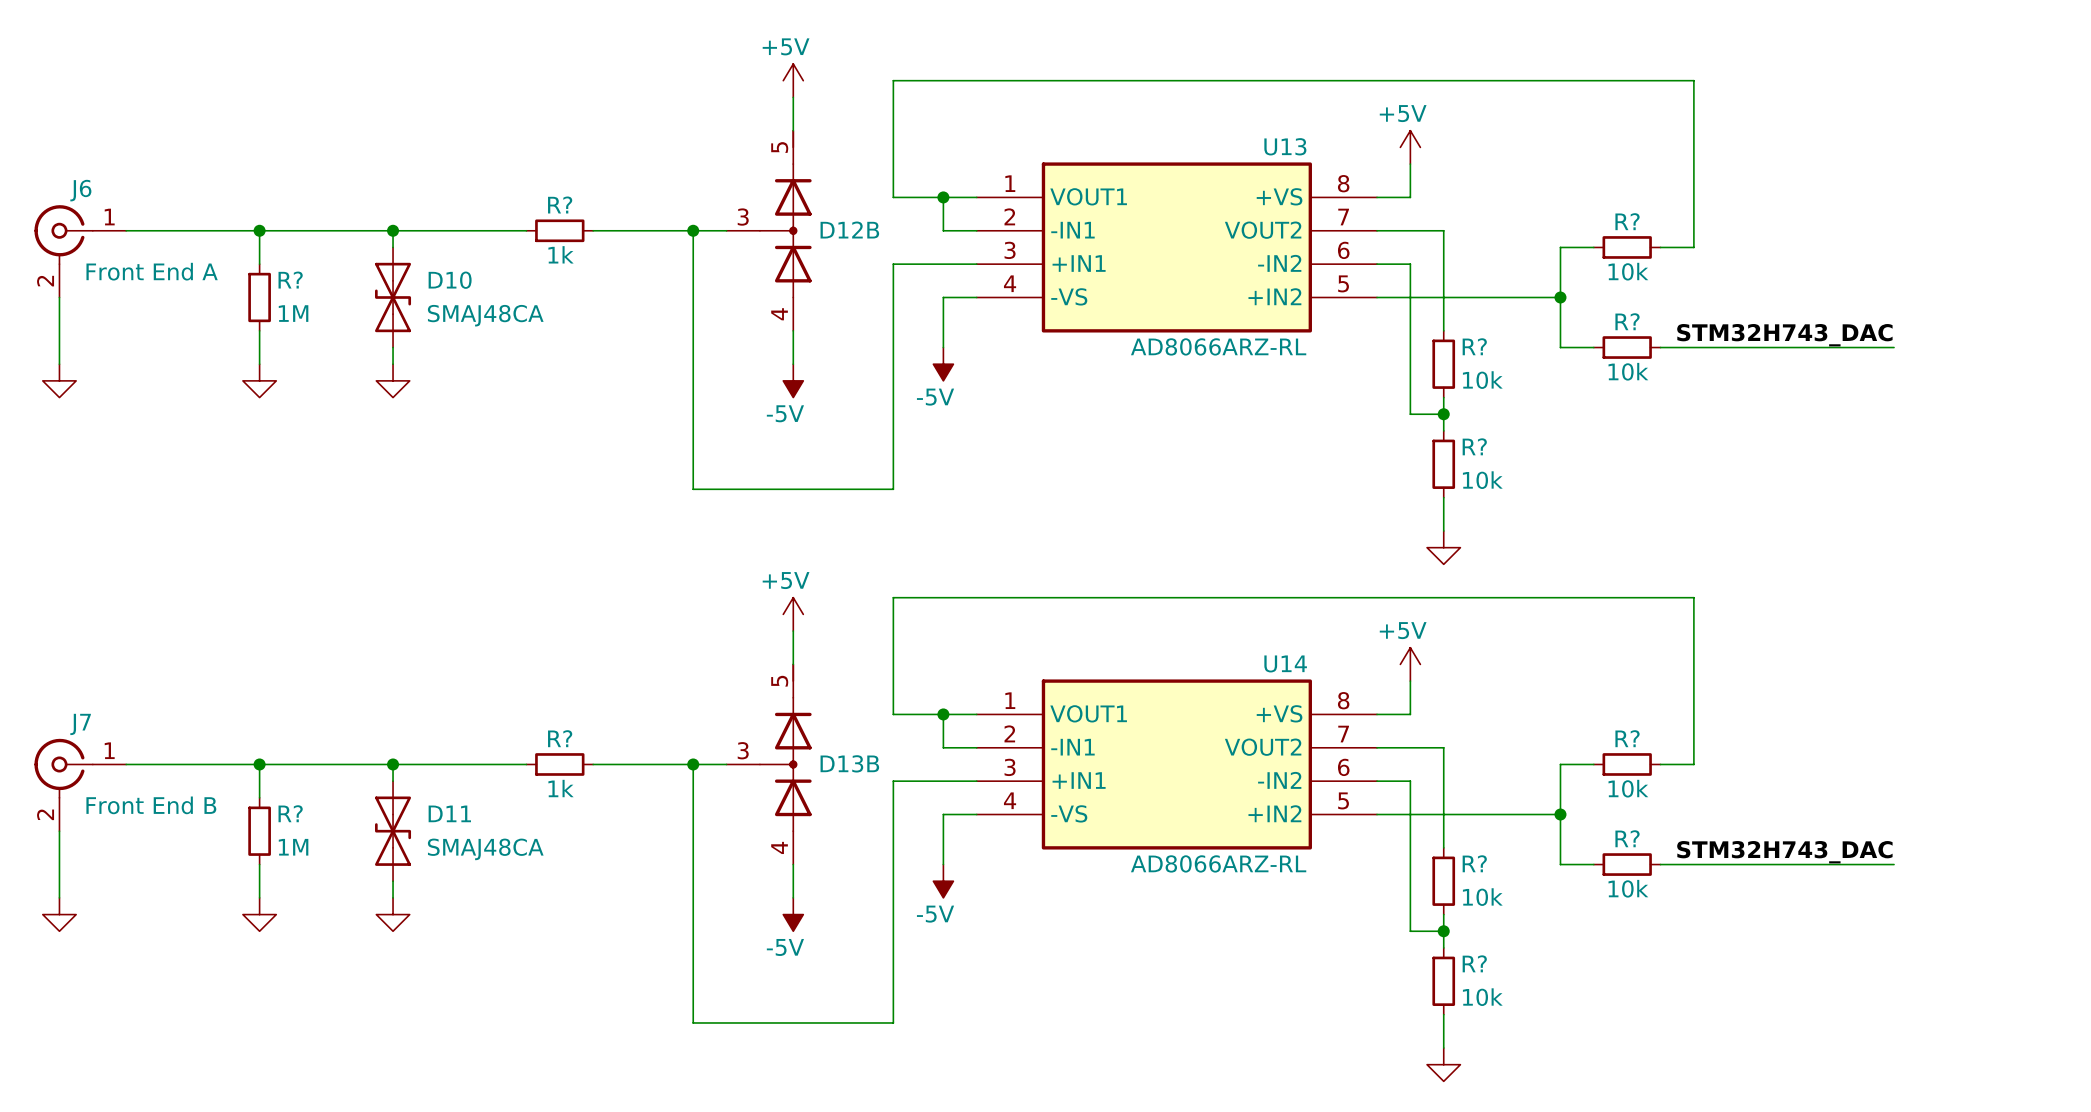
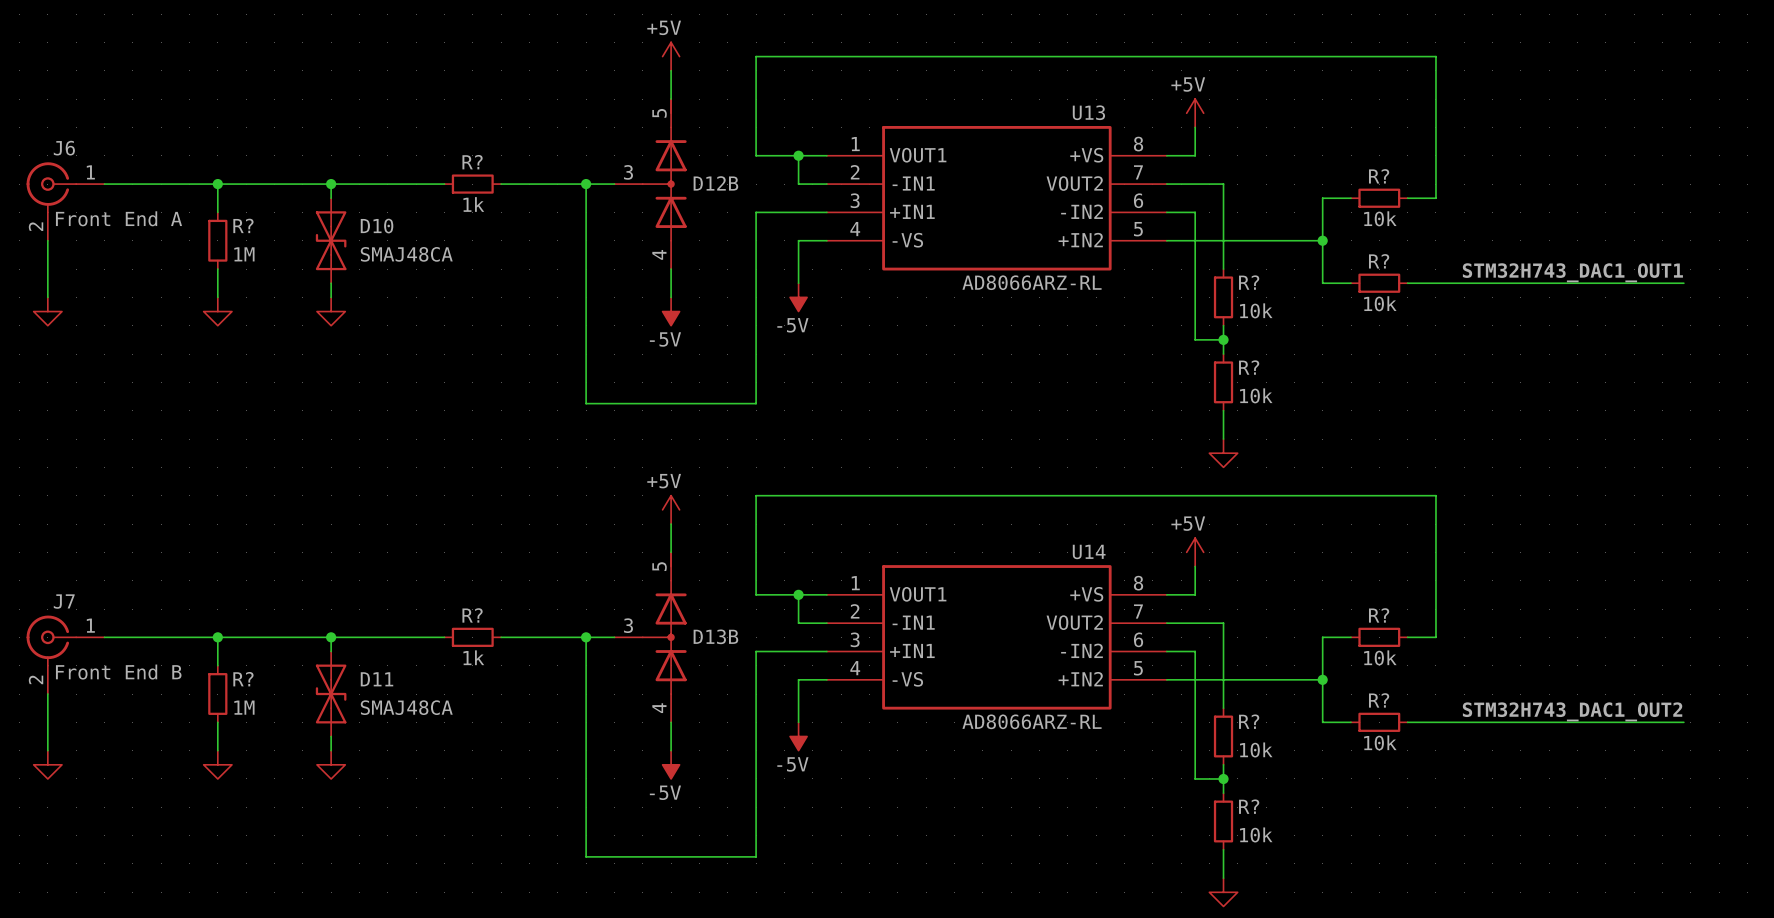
label: STM32H743_DAC (1784, 335) -> STM32H743_DAC1_OUT1 (1572, 272)
wire: none -> (1605, 283) (1683, 283)
label: STM32H743_DAC (1784, 852) -> STM32H743_DAC1_OUT2 (1572, 711)
wire: none -> (1605, 722) (1683, 722)

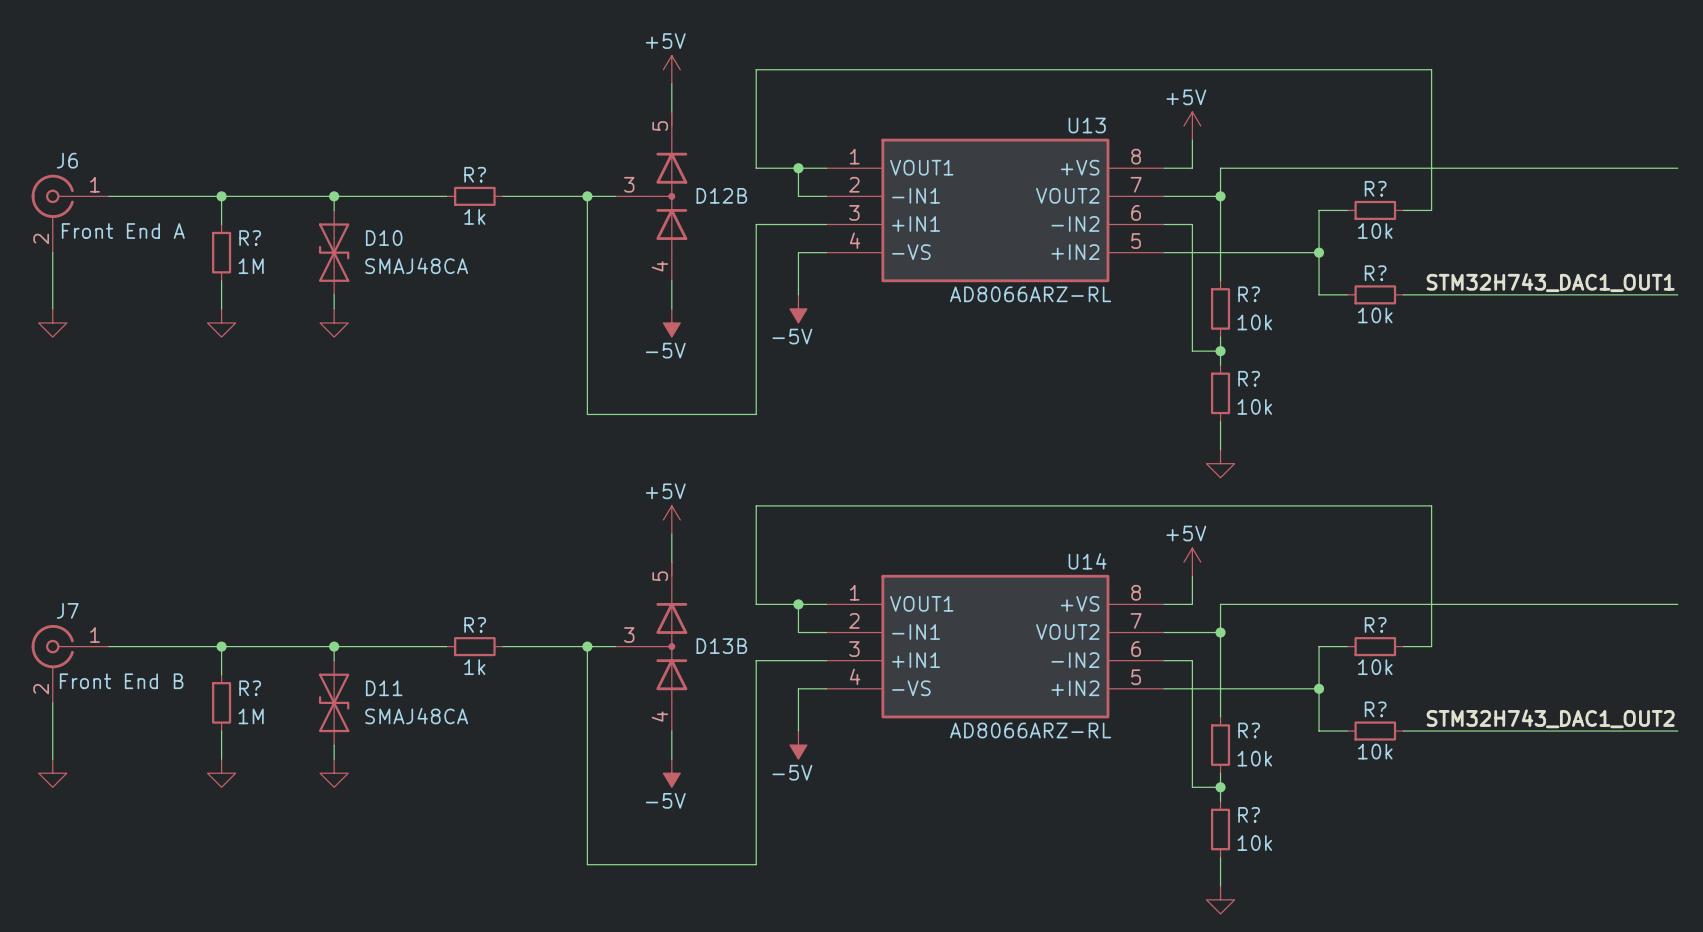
wire: none -> (1677, 168) (1220, 168) (1220, 196)
junction: none -> (1220, 196)
wire: none -> (1677, 604) (1220, 604) (1220, 632)
junction: none -> (1220, 632)

